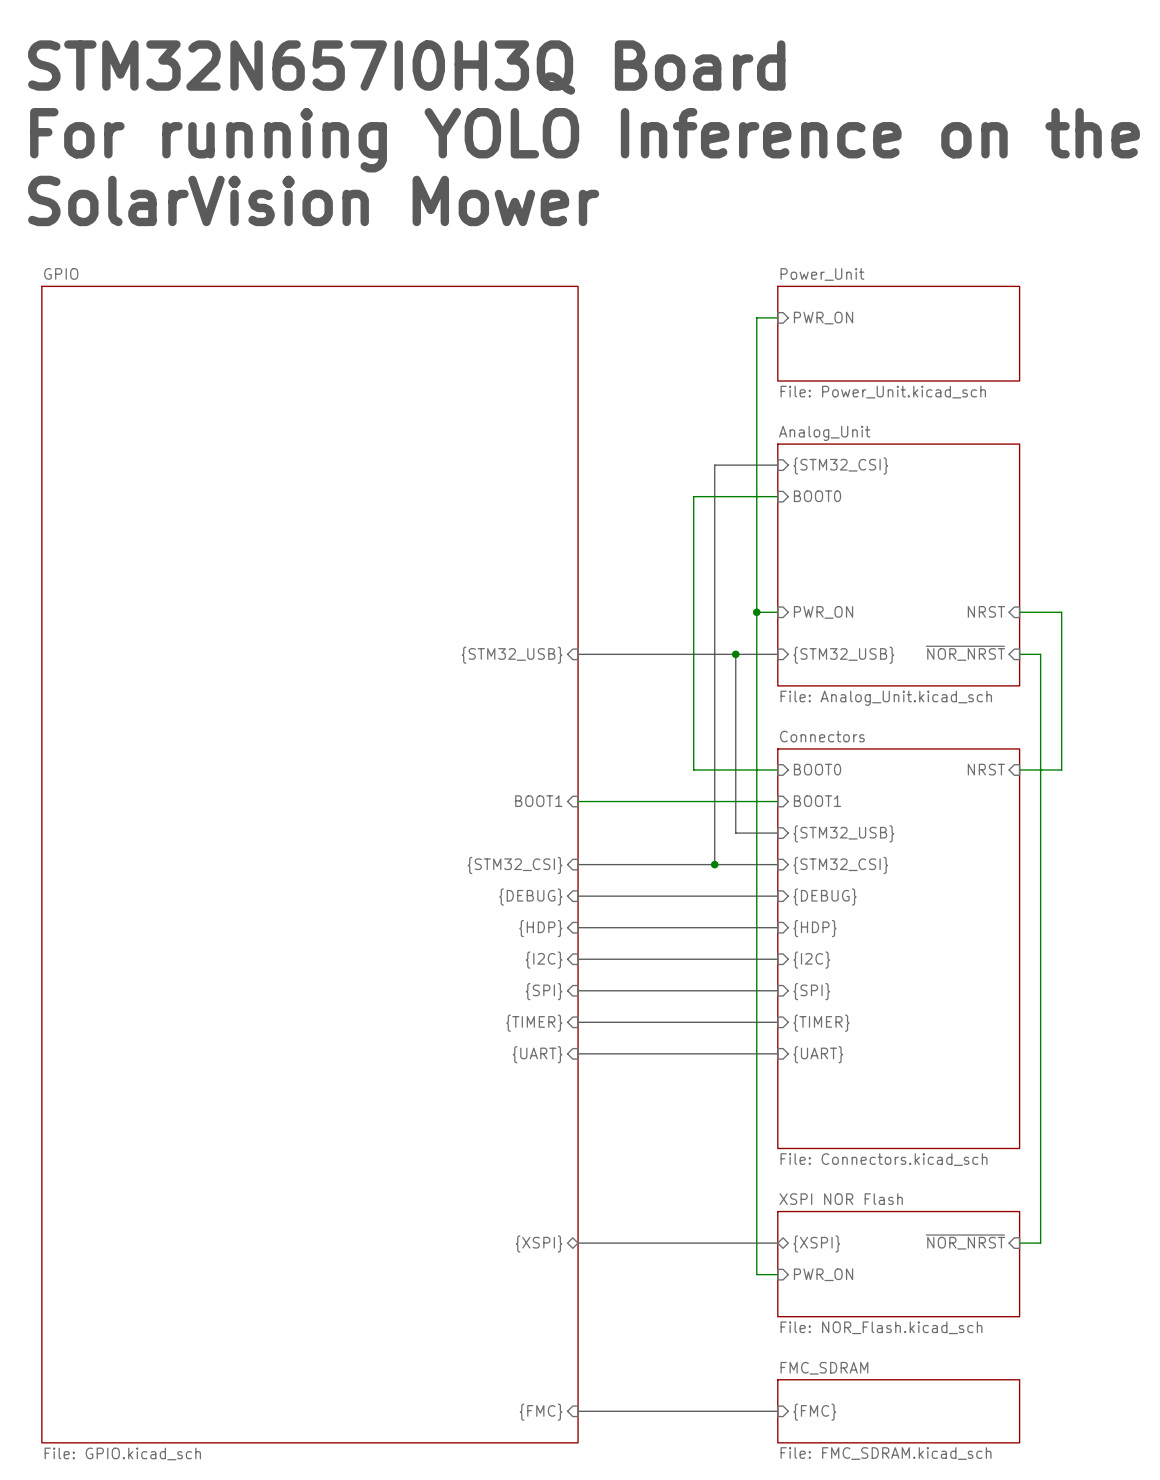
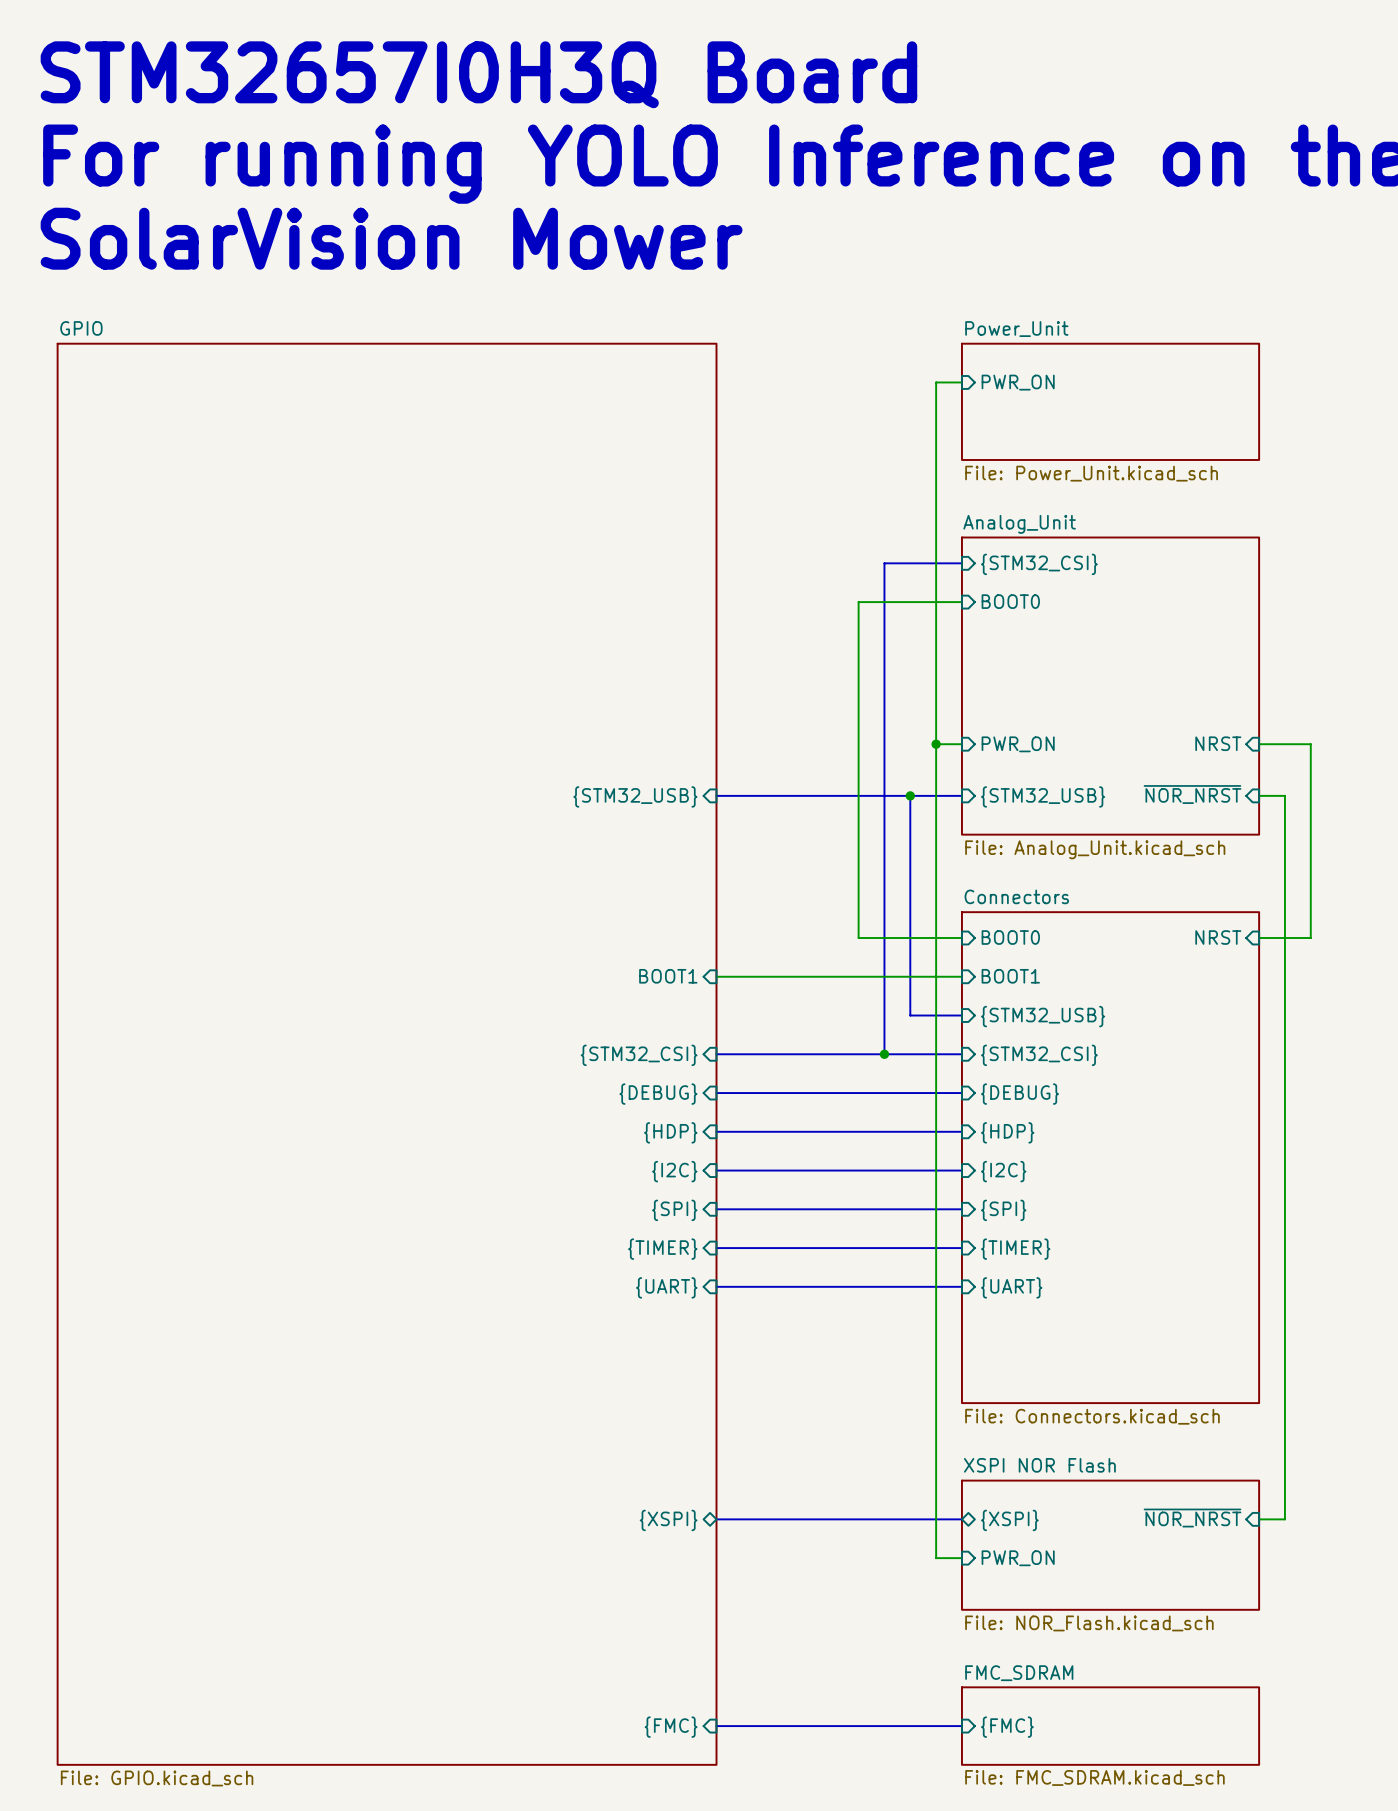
text: STM32N657I0H3Q Board (406, 67) -> STM32657I0H3Q Board (478, 74)

